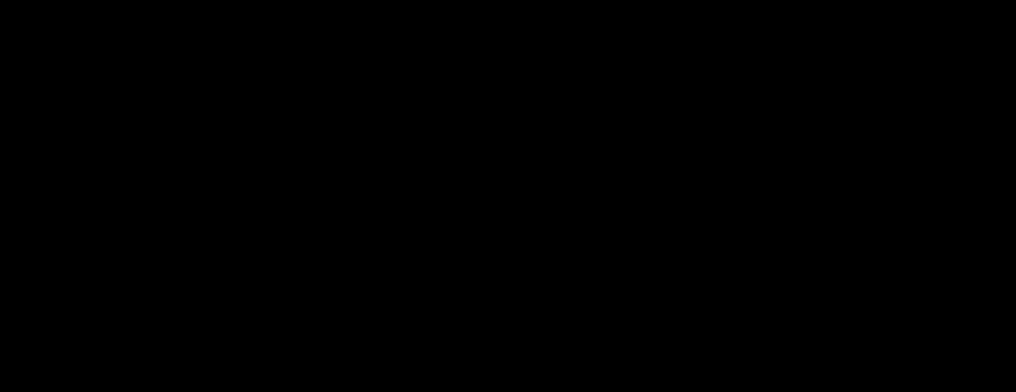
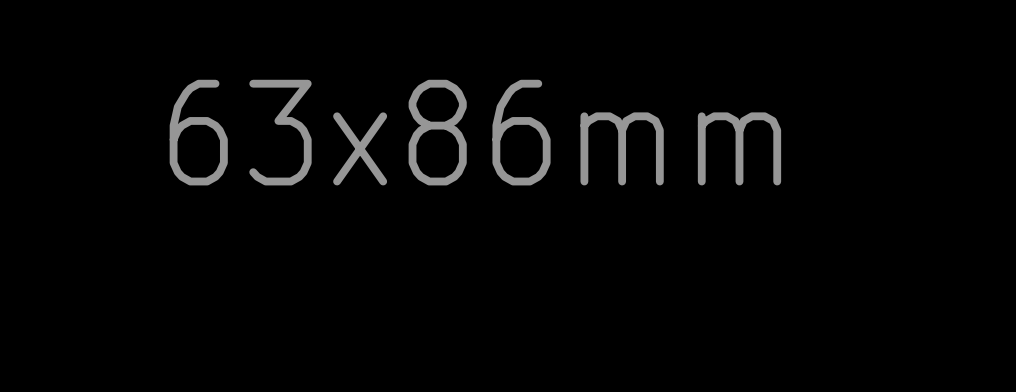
text: none -> 63x86mm (475, 132)

